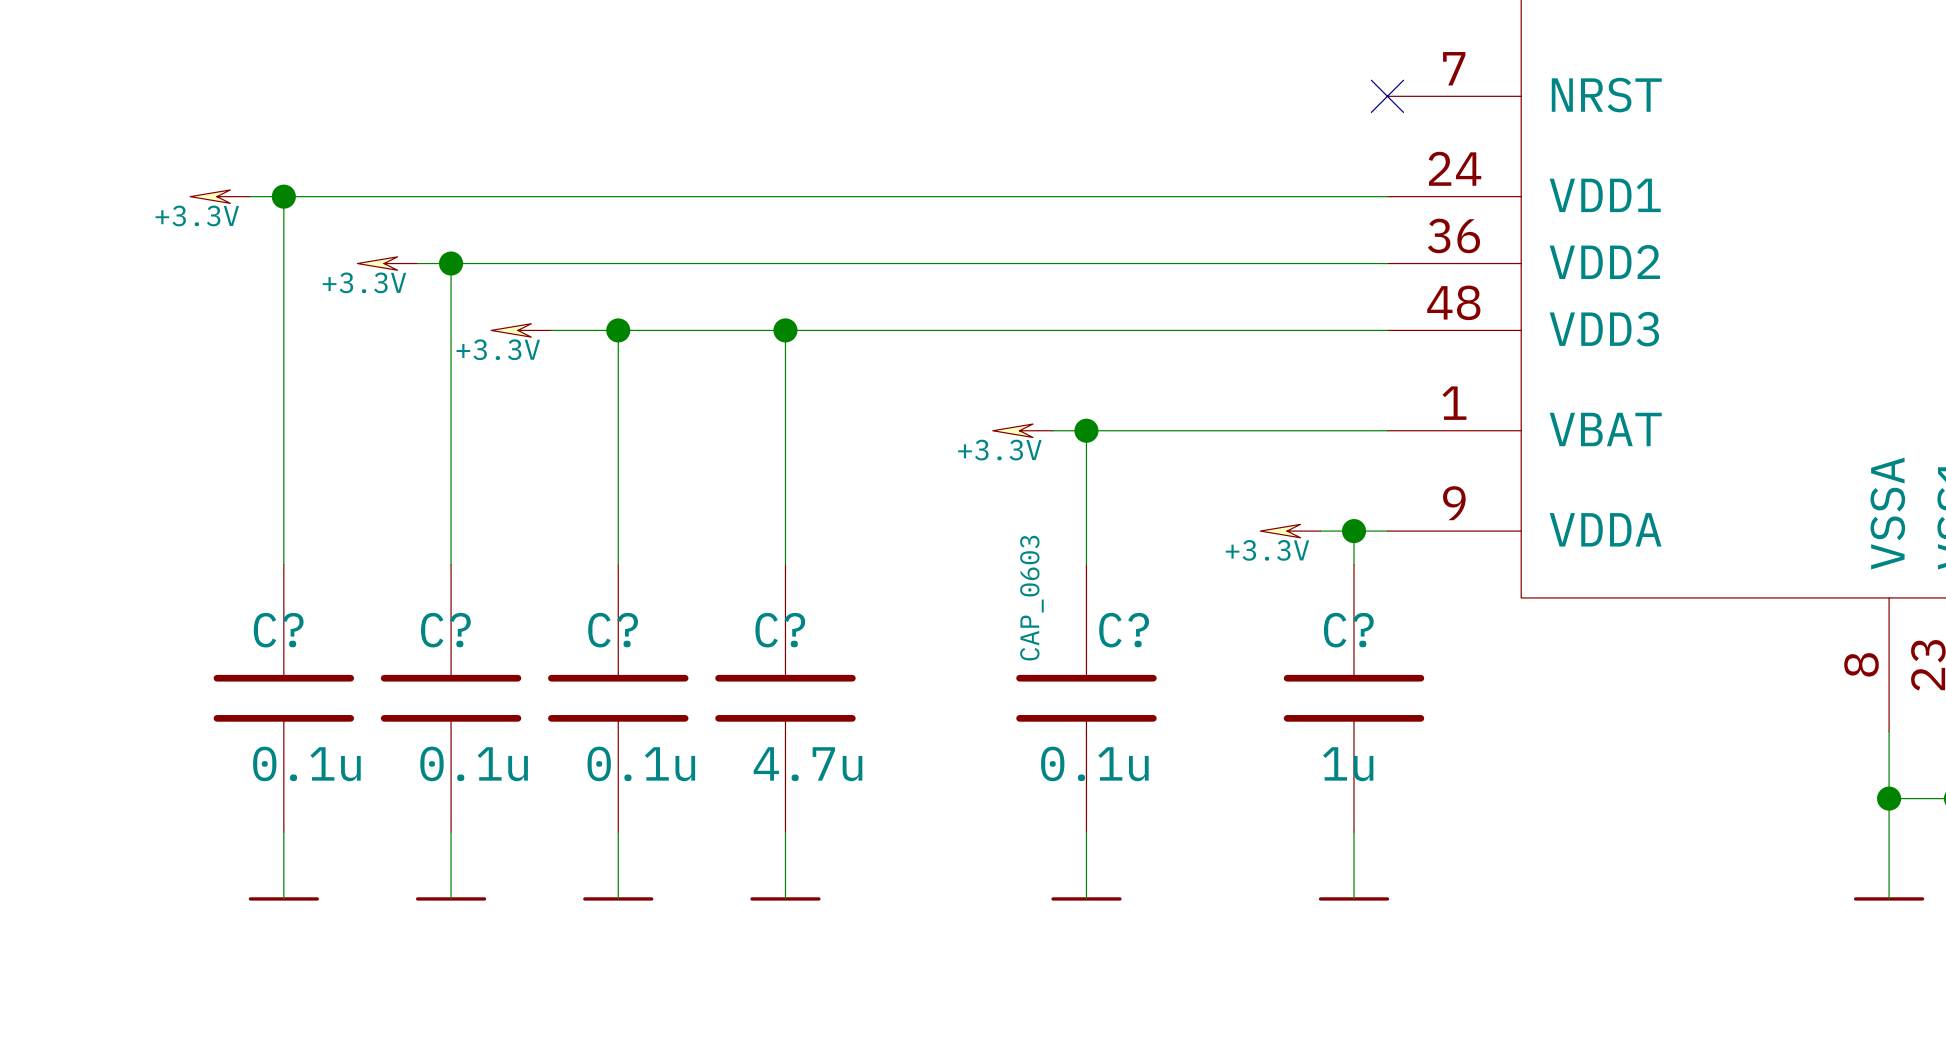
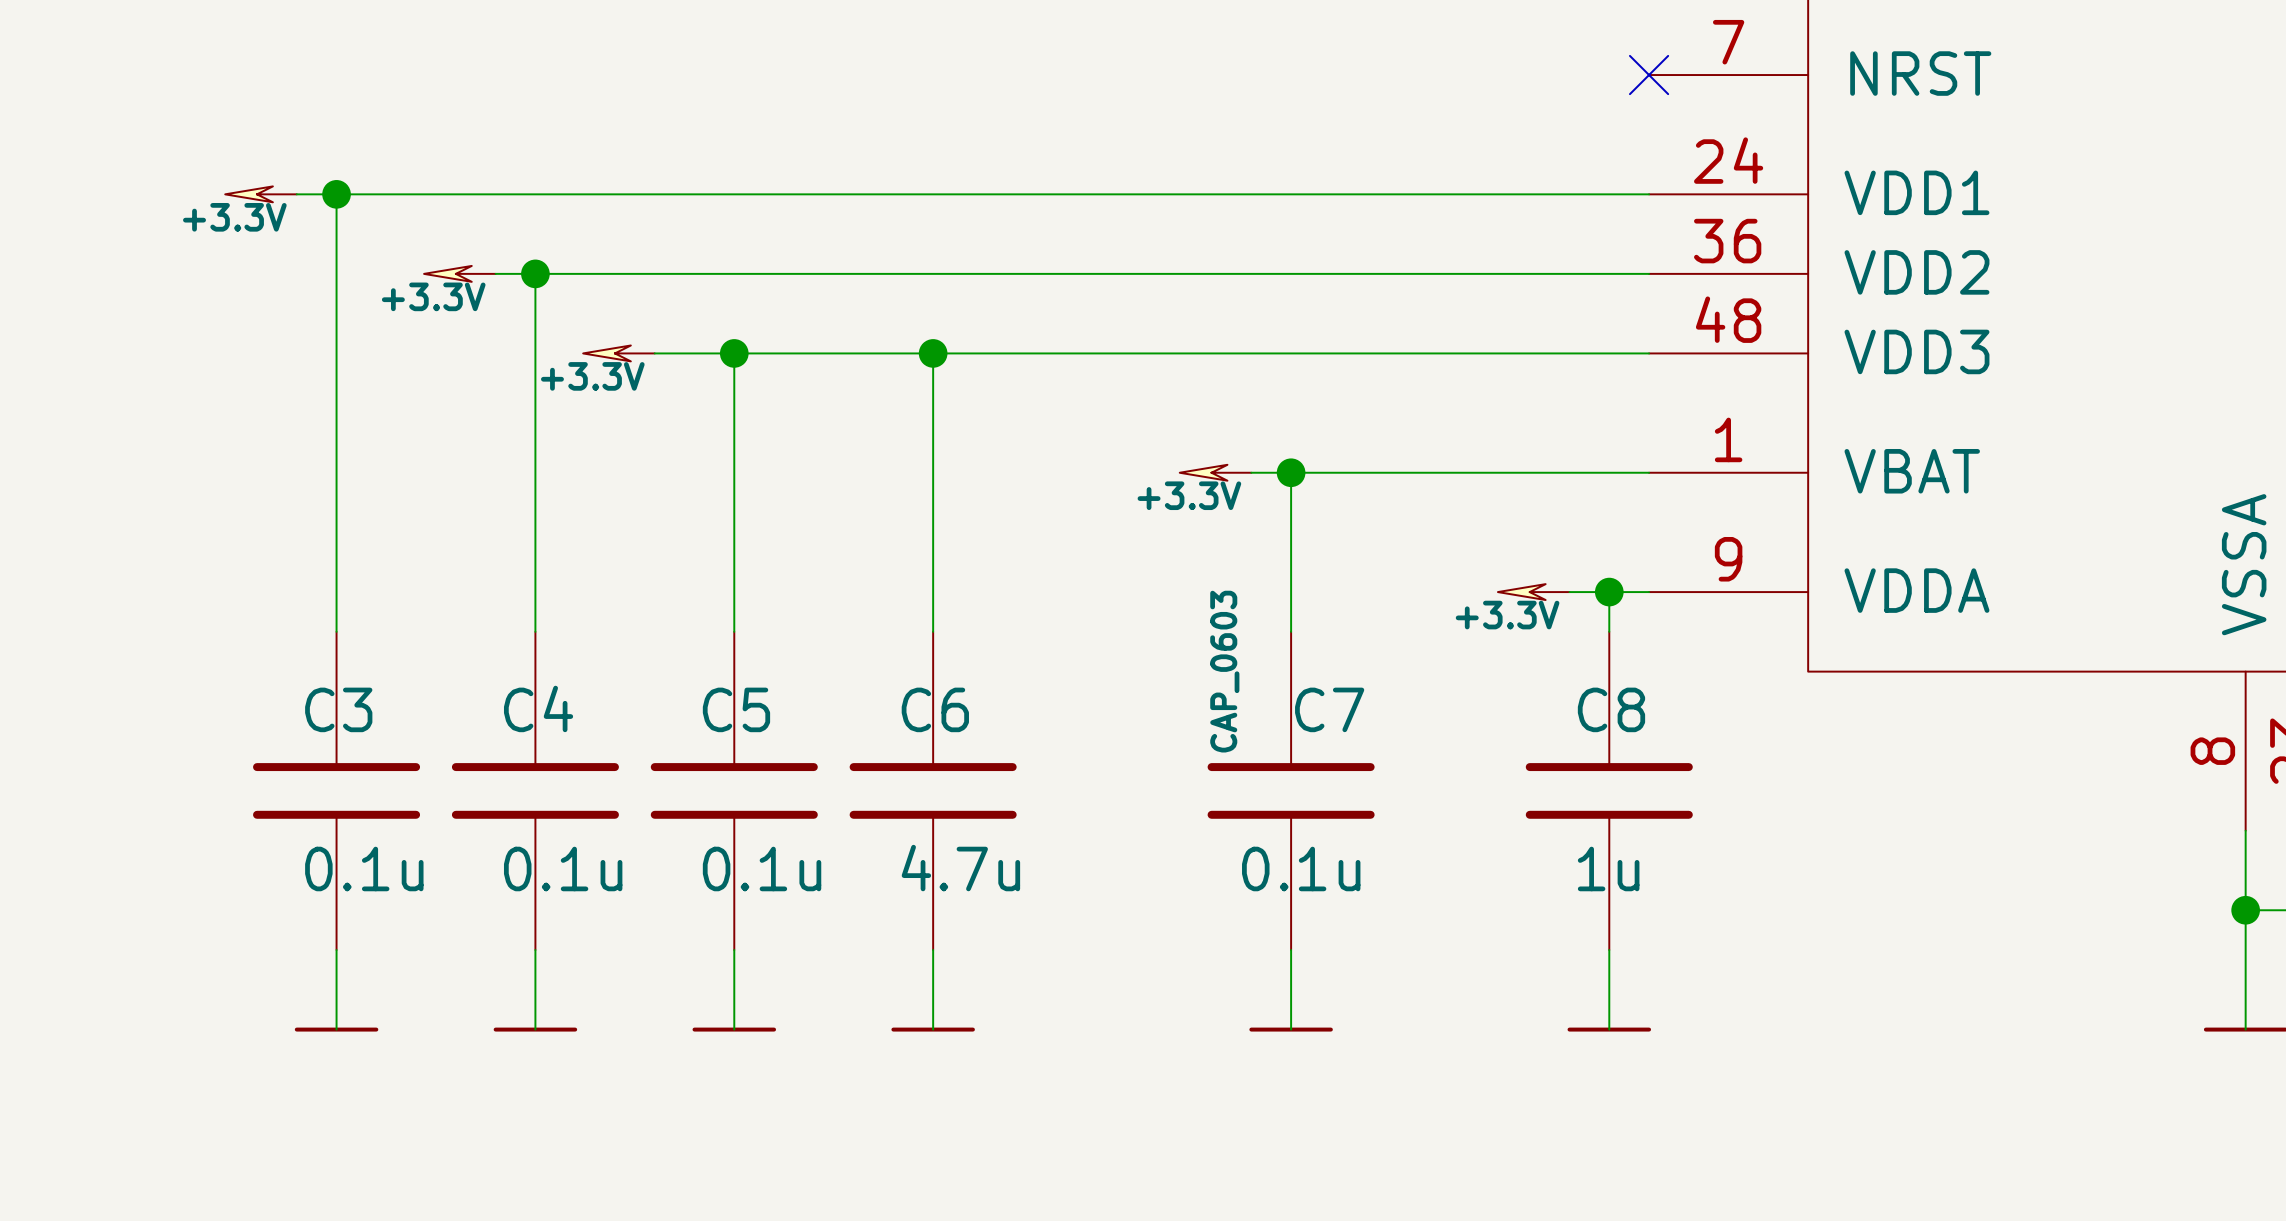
C? name: C? (278, 630) -> C3 (338, 709)
C? name: C? (445, 630) -> C4 (538, 708)
C? name: C? (613, 630) -> C5 (736, 709)
C? name: C? (780, 630) -> C6 (935, 709)
C? name: C? (1124, 630) -> C7 (1329, 709)
C? name: C? (1348, 630) -> C8 (1611, 709)

